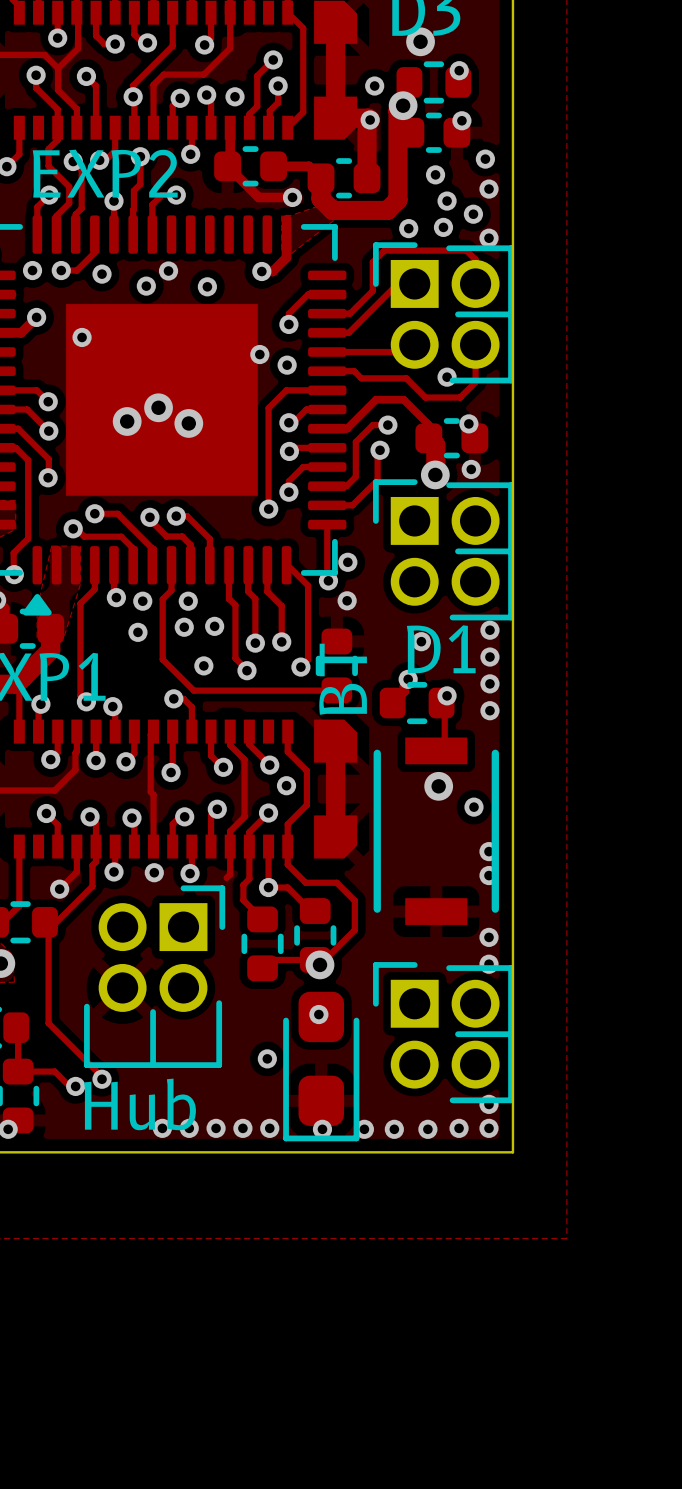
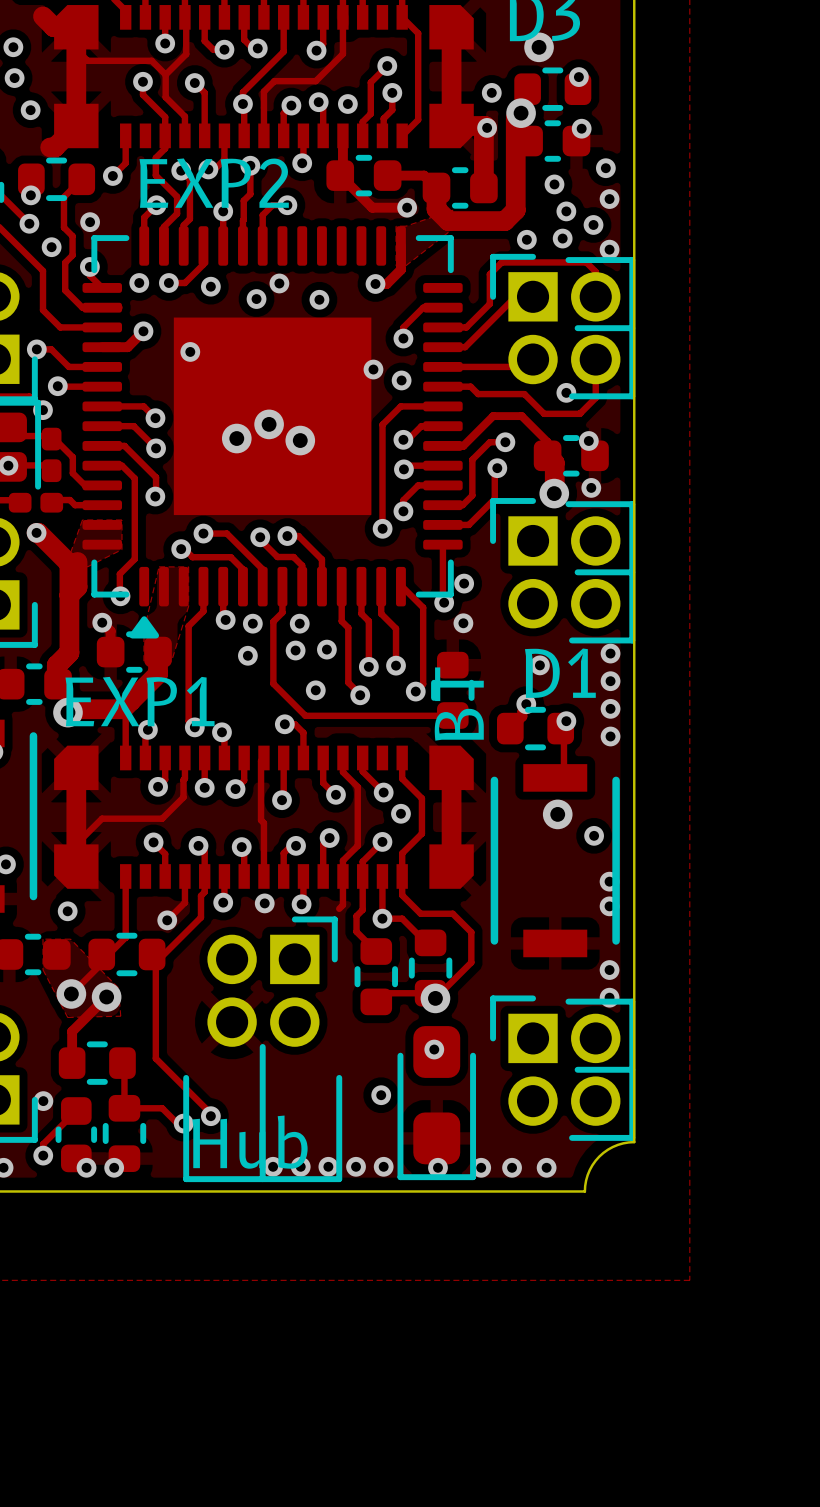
part footprint: [84, 885, 226, 1068] -> [183, 916, 343, 1183]
via: (489, 1104) -> none
board edge: (512, 1104) (512, 1152) (465, 1152) -> (634, 1142) (617, 1144) (599, 1156) (587, 1175) (584, 1191)
via: (459, 1128) -> none
via: (489, 1128) -> none

